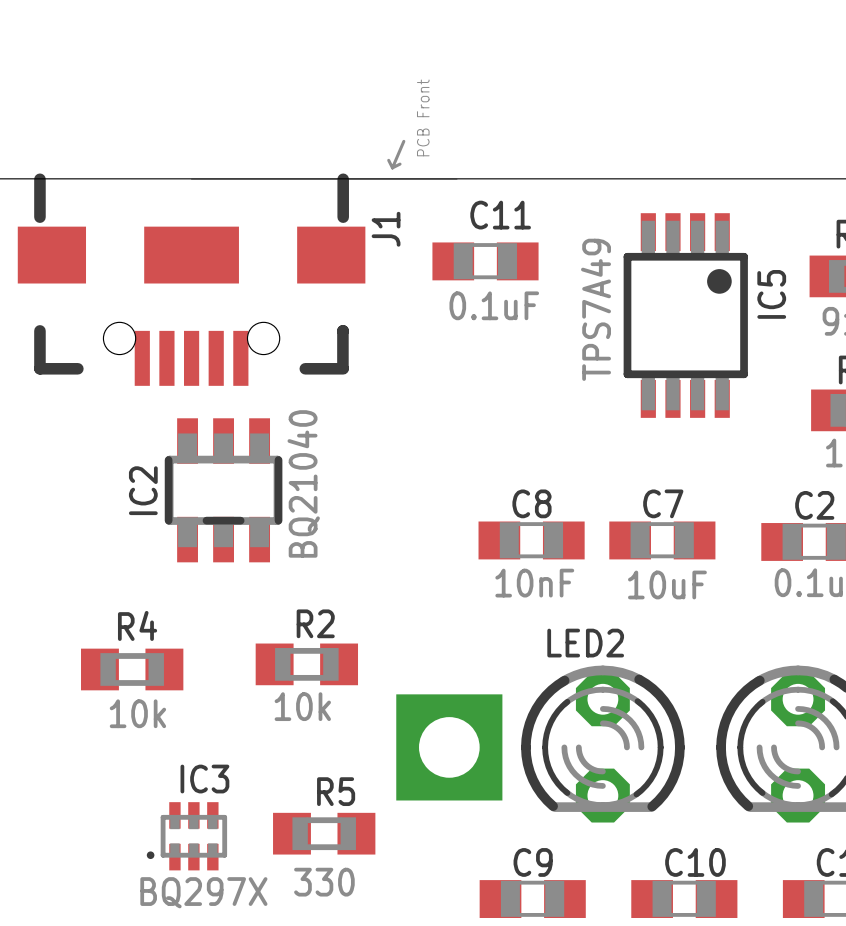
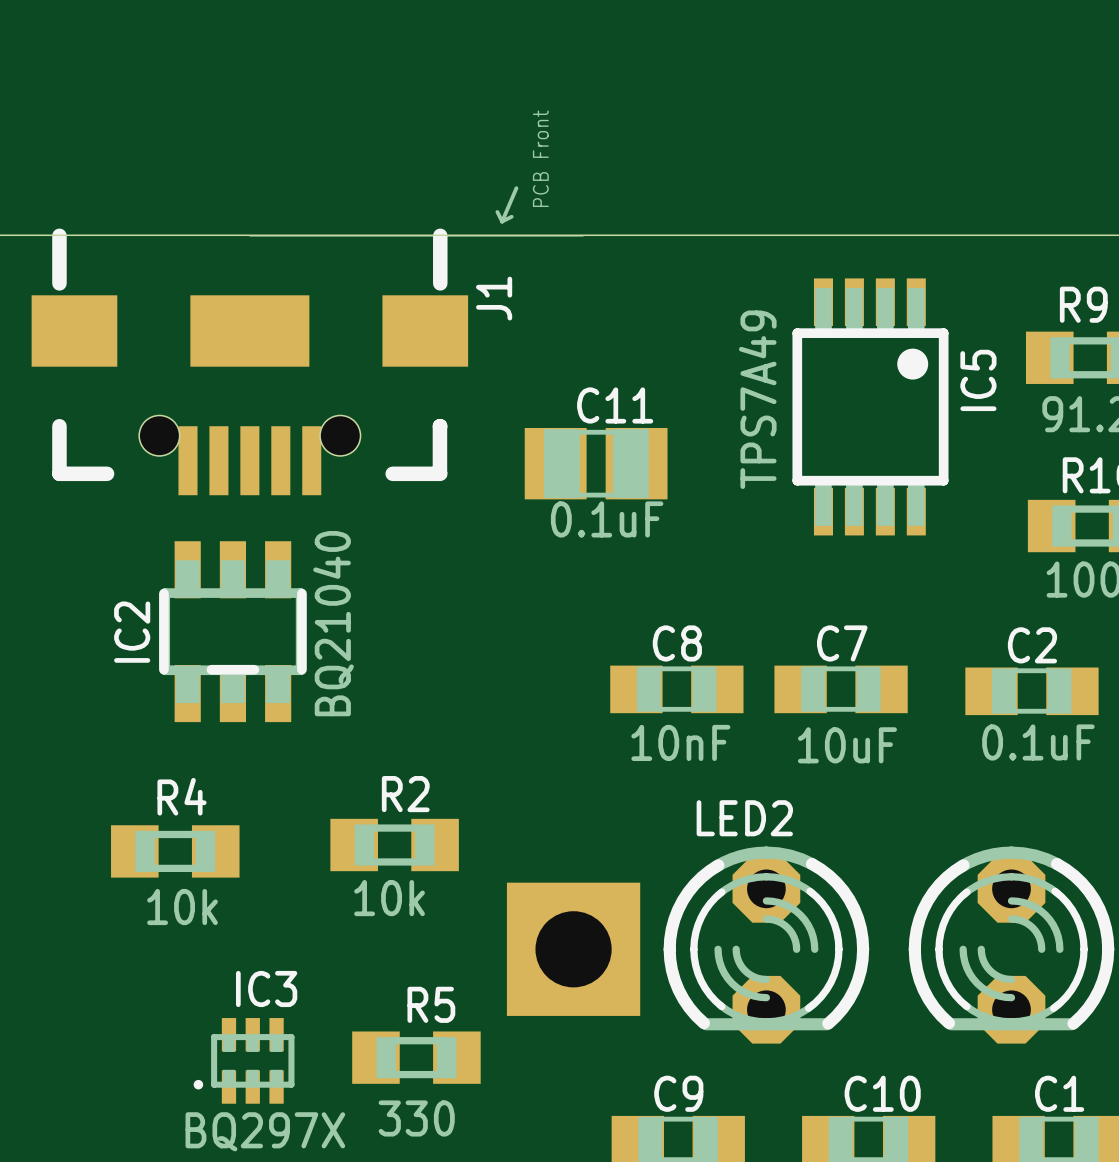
C11 footprint: [432, 242, 539, 281] -> [524, 427, 668, 500]
IC2 position: (223, 490) -> (232, 631)

